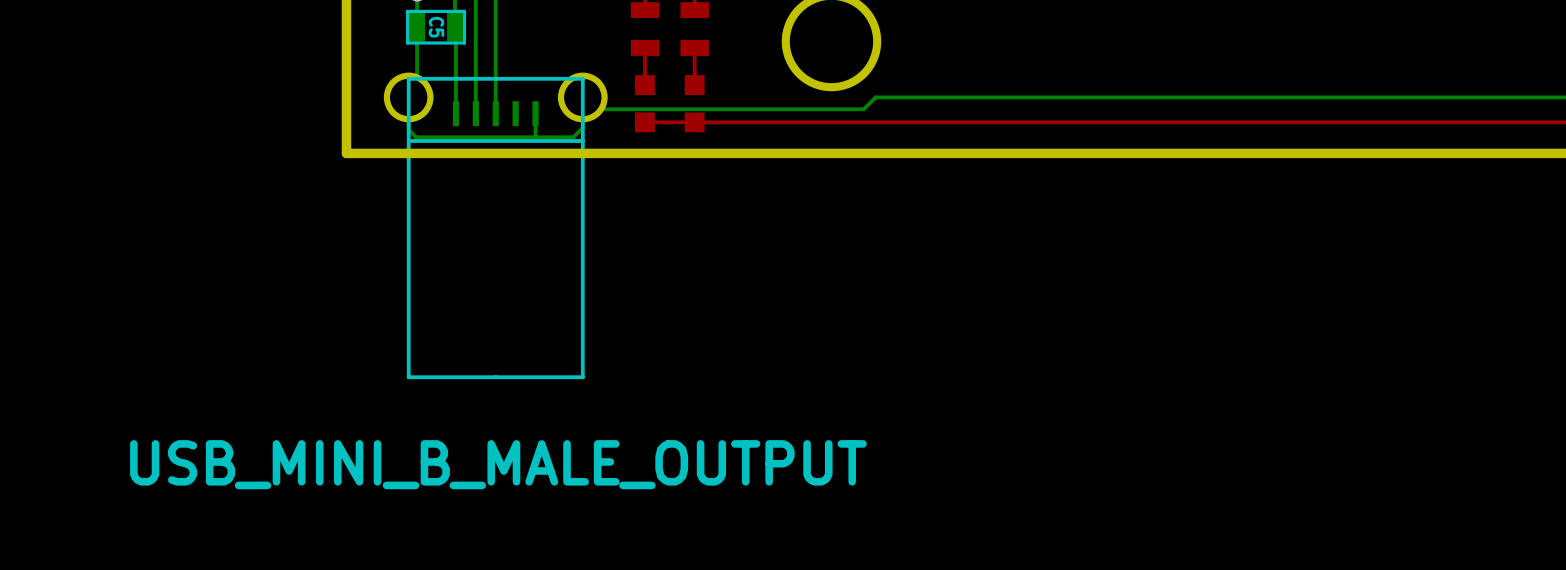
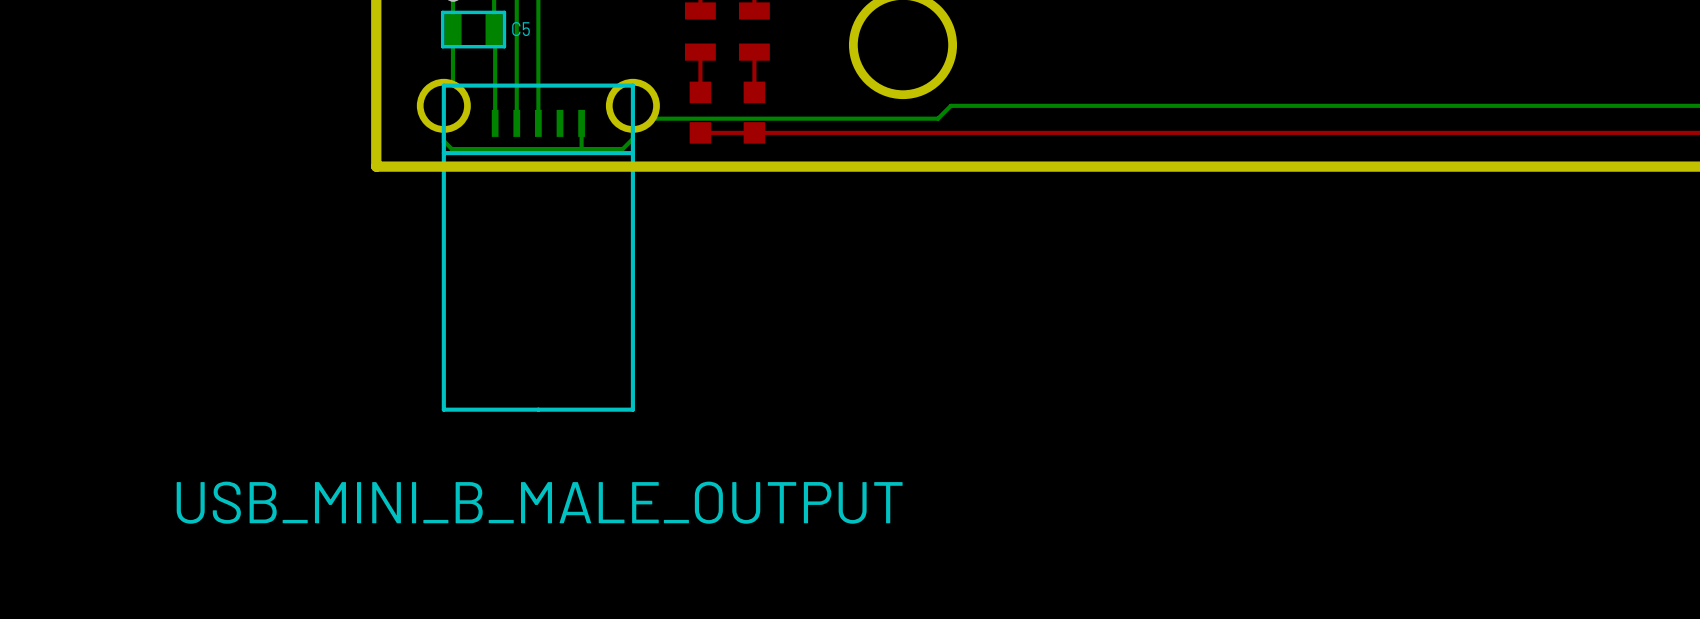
C5 name rotation: 0° (436, 27) -> 90° counterclockwise (521, 29)
C5 name position: C5 (436, 27) -> C5 (521, 29)

